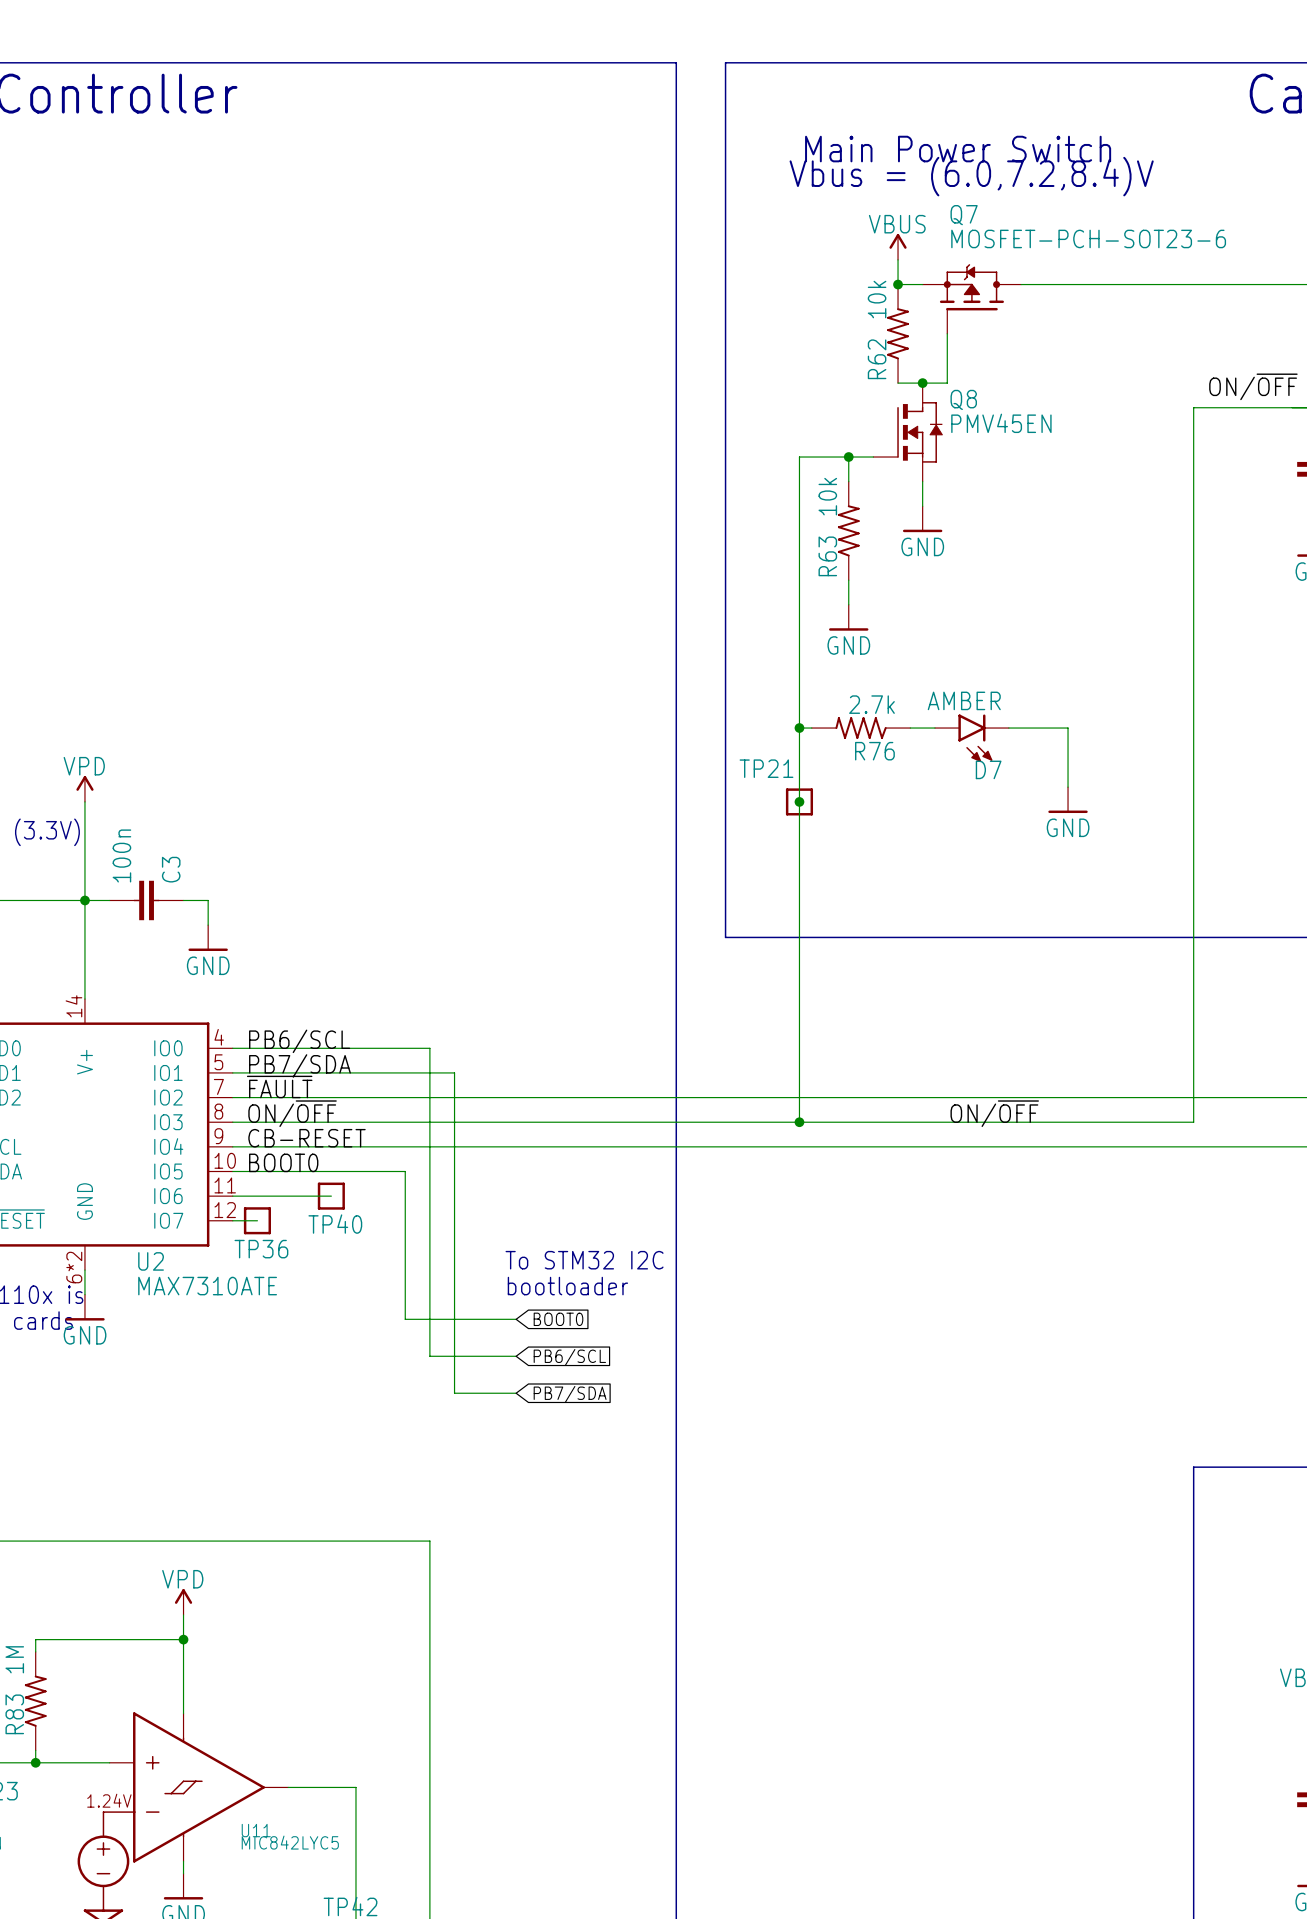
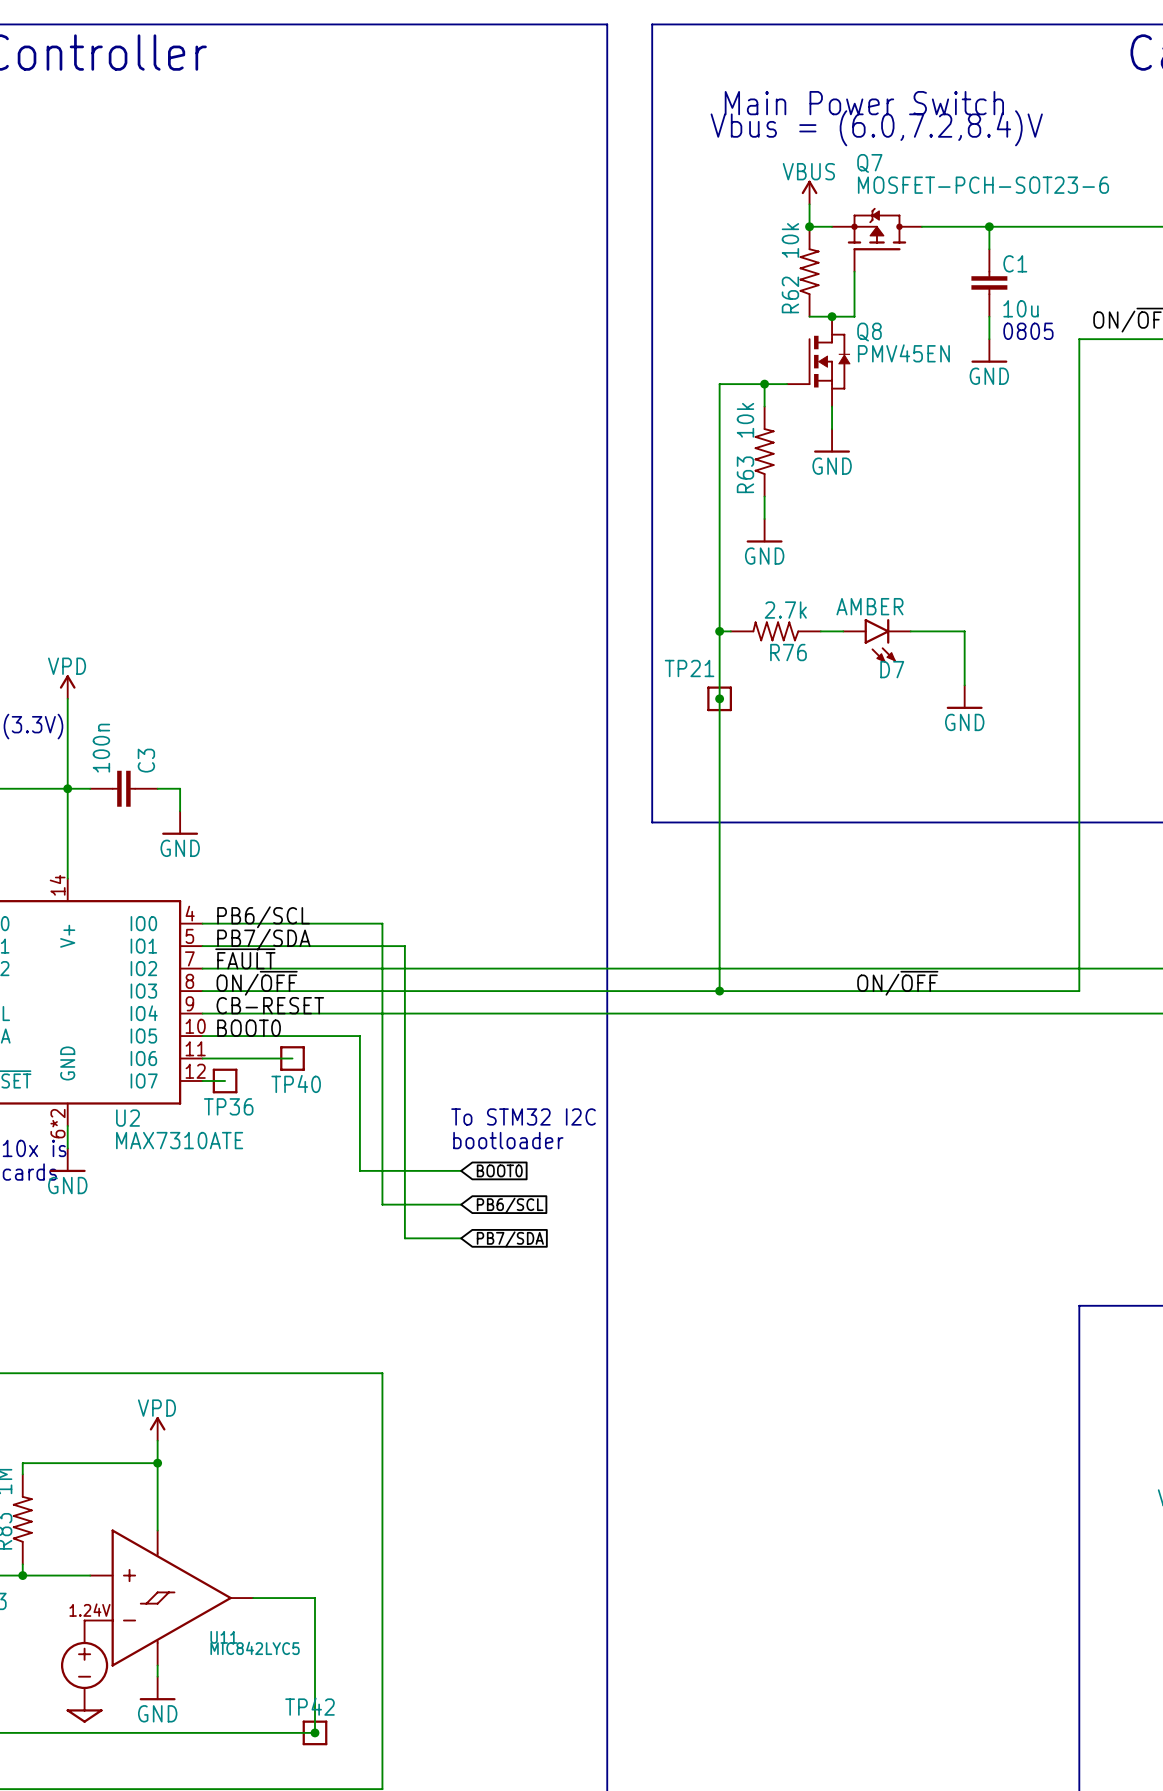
wire: none -> (989, 226) (989, 249)
junction: none -> (989, 226)
C1: none -> 10u (989, 282)
wire: none -> (989, 316) (989, 339)
text: none -> 0805 (1028, 331)
power symbol: none -> GND (989, 350)

